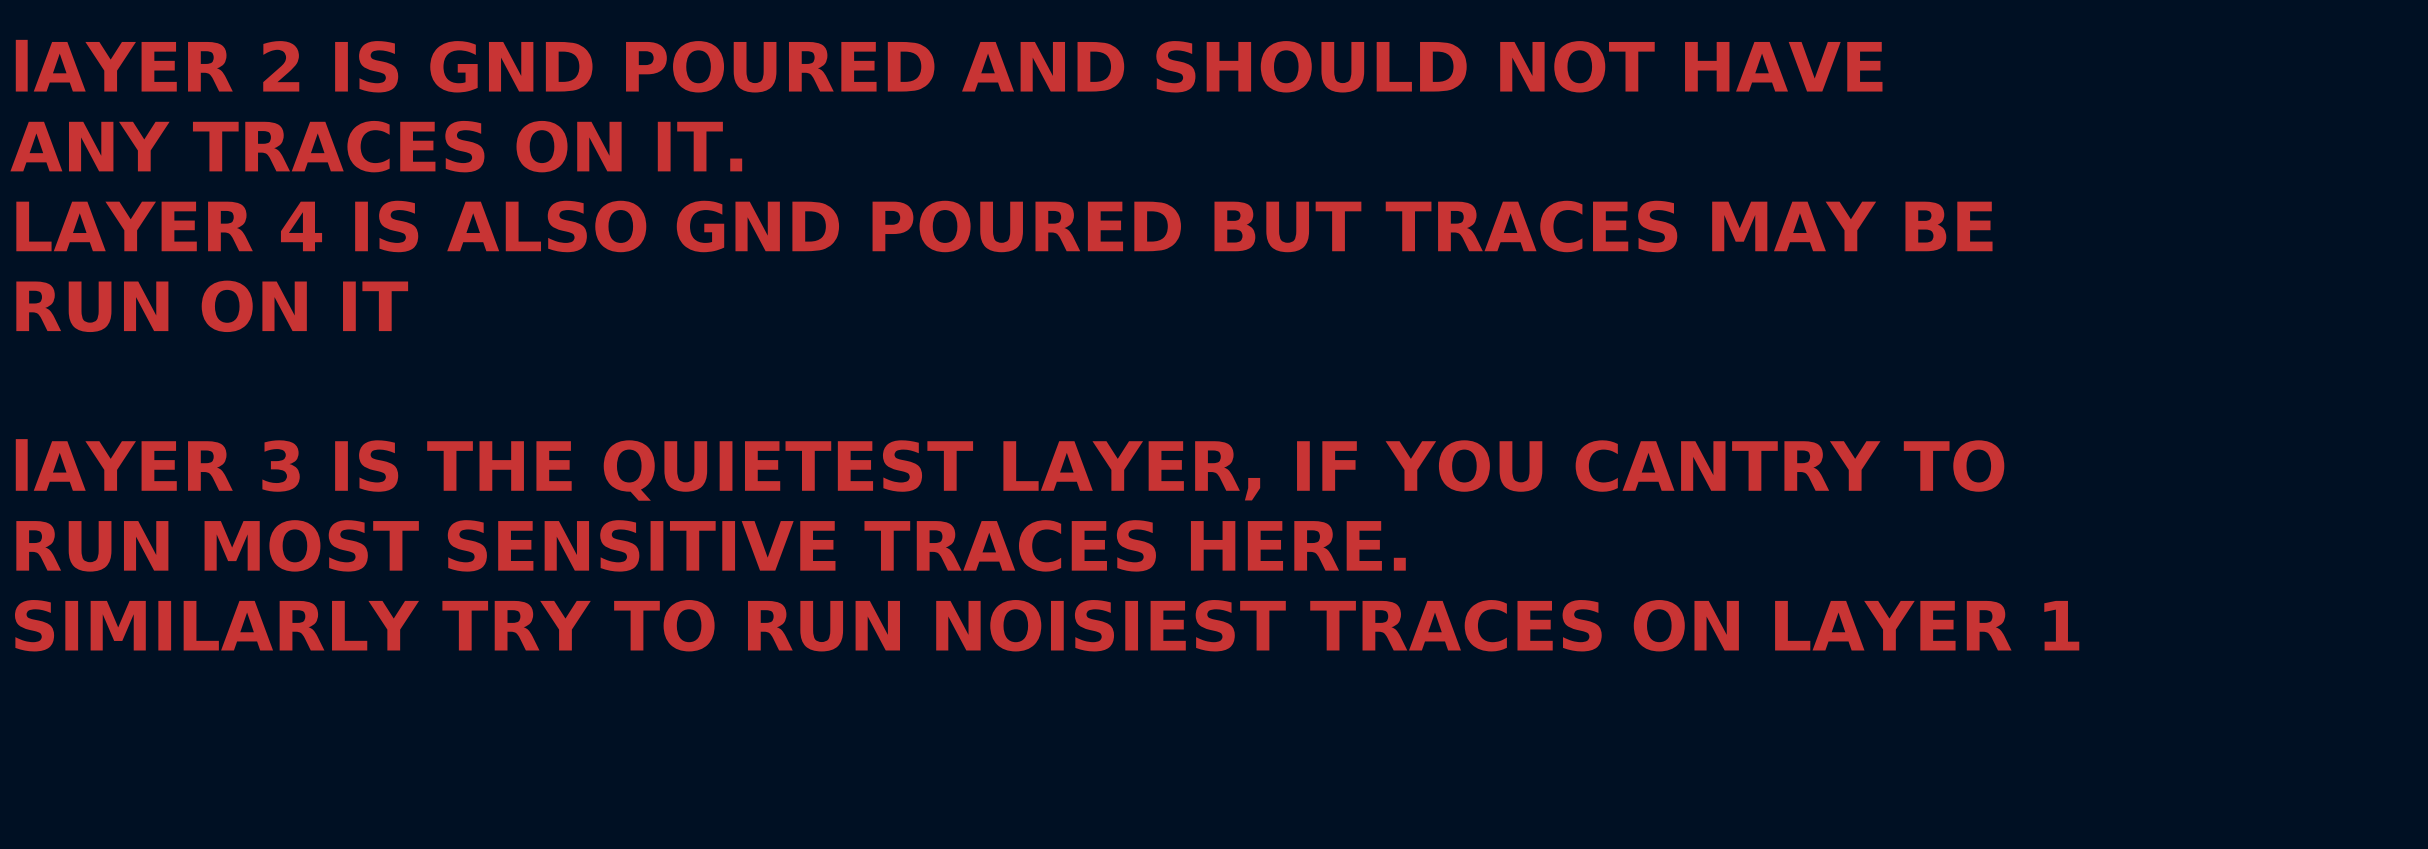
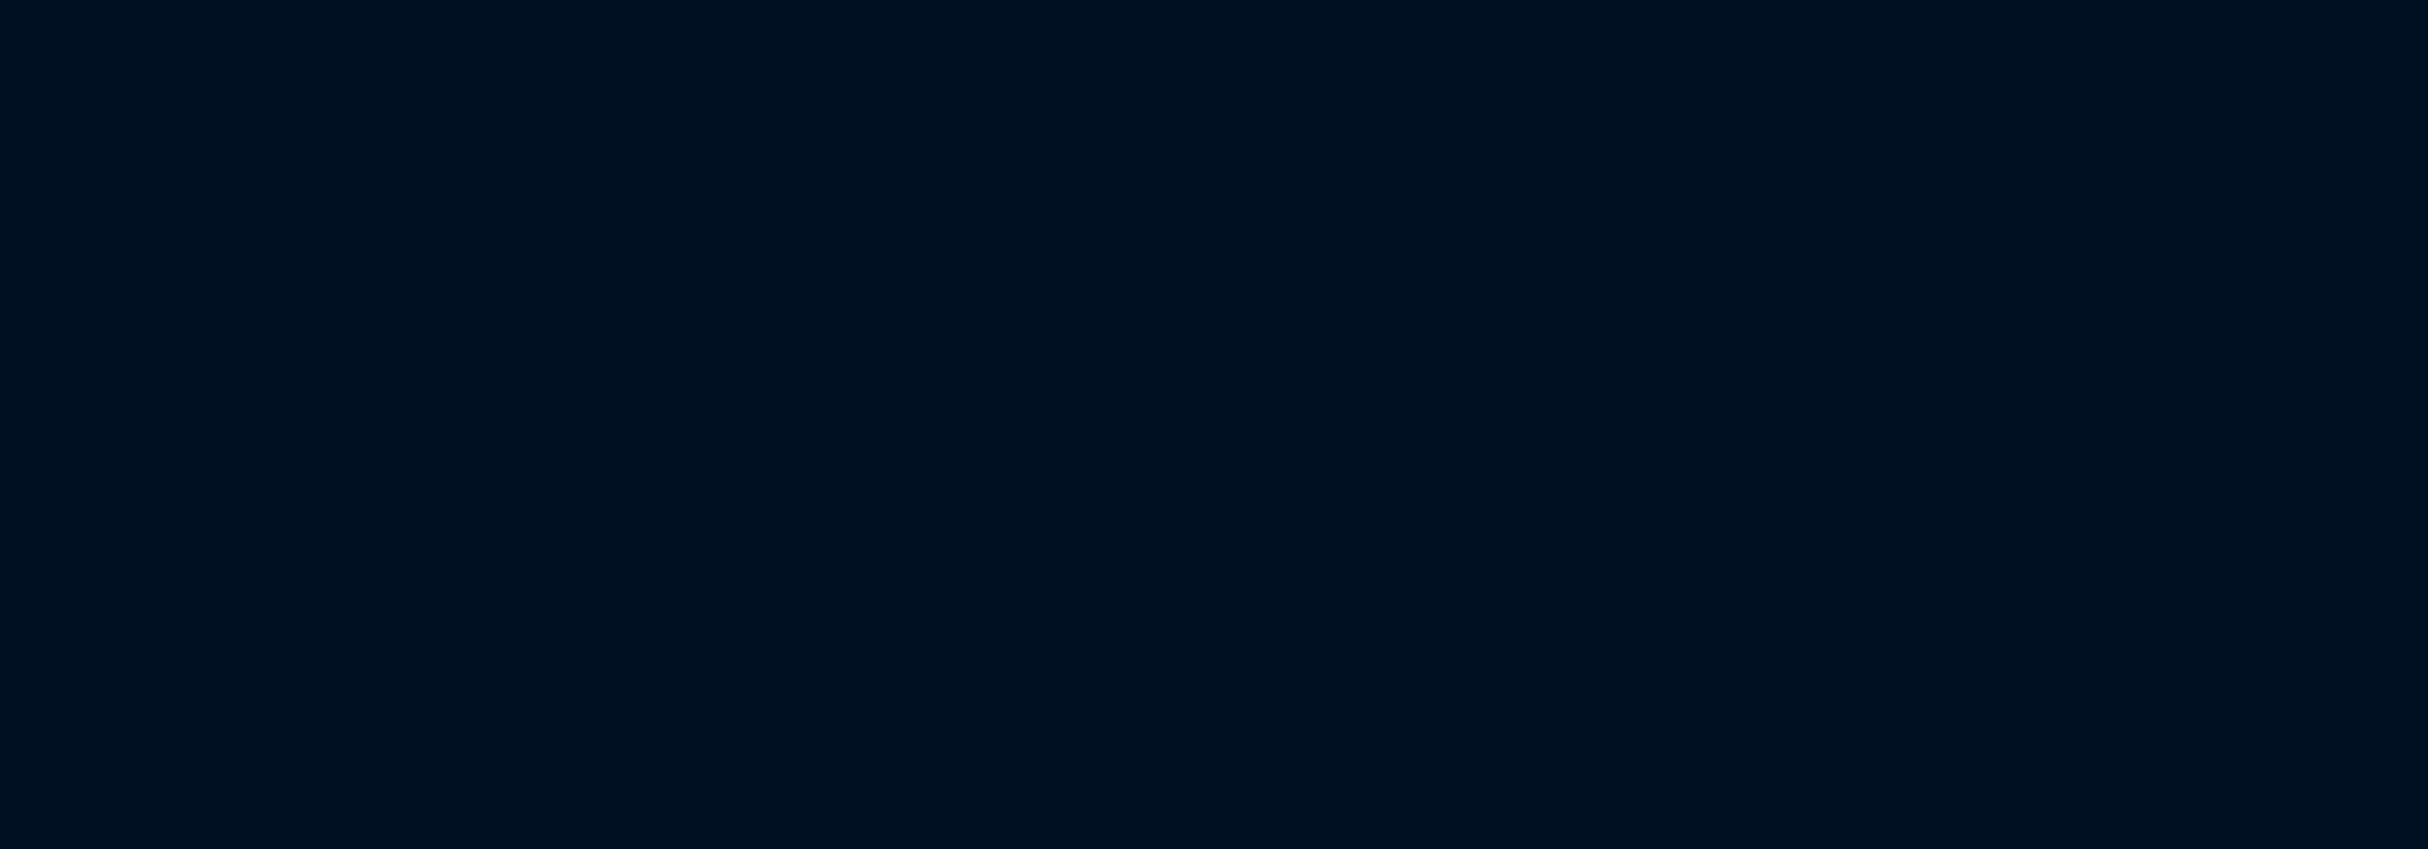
text: lAYER 2 IS GND POURED AND SHOULD NOT HAVE (949, 66) -> none
text: ANY TRACES ON IT. (376, 146) -> none
text: LAYER 4 IS ALSO GND POURED BUT TRACES MAY BE (1004, 226) -> none
text: RUN ON IT (212, 306) -> none
text: lAYER 3 IS THE QUIETEST LAYER, IF YOU CANTRY TO (1010, 469) -> none
text: RUN MOST SENSITIVE TRACES HERE. (711, 545) -> none
text: SIMILARLY TRY TO RUN NOISIEST TRACES ON LAYER 1 (1047, 625) -> none

